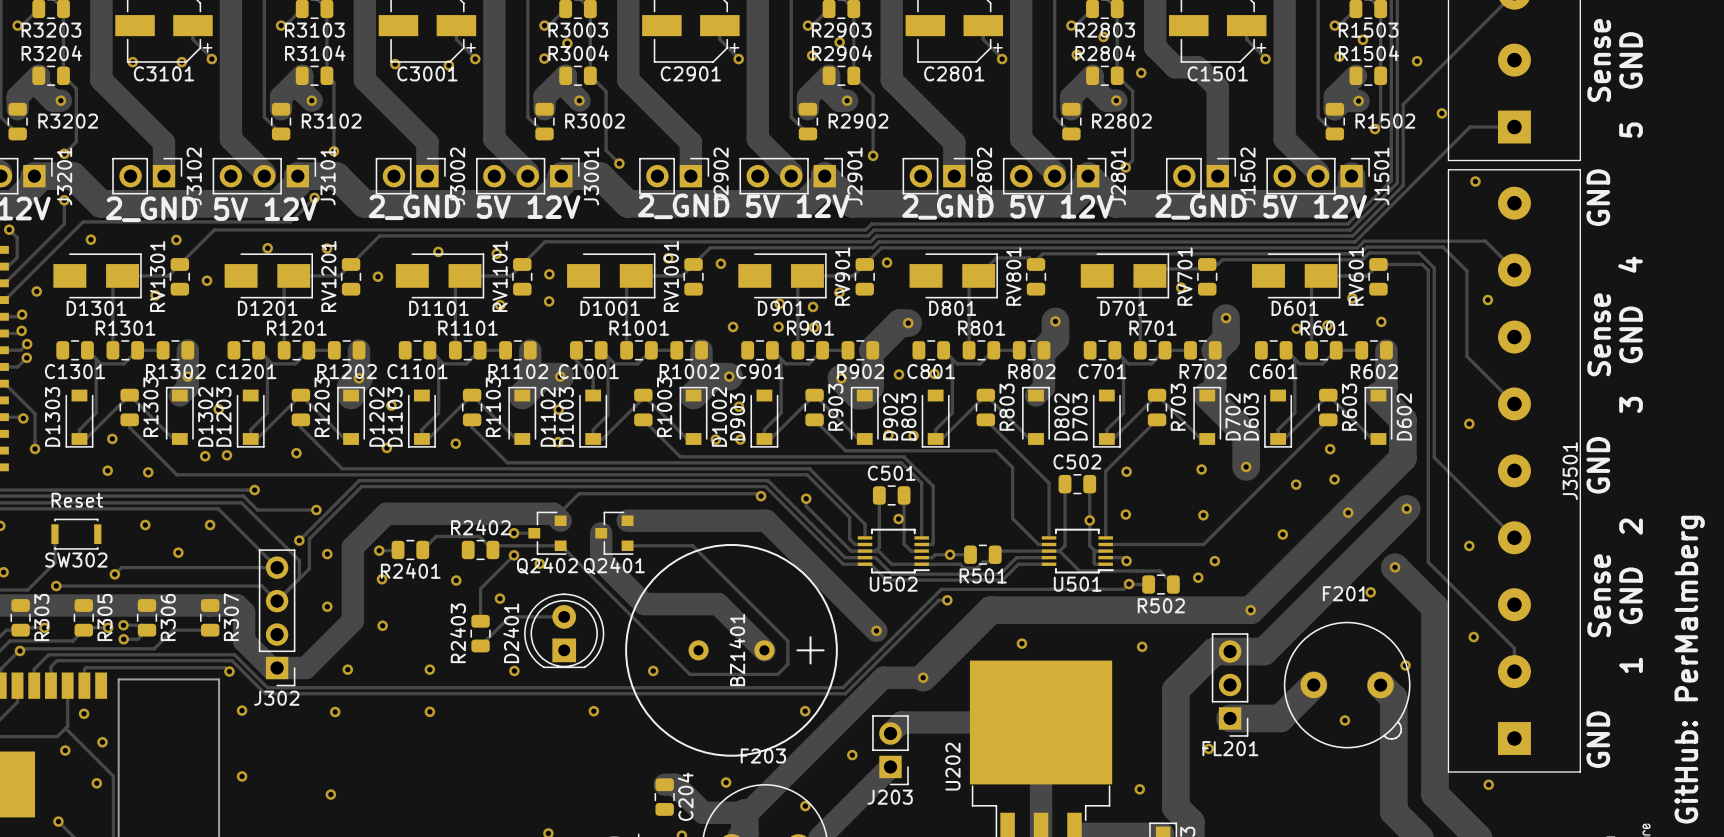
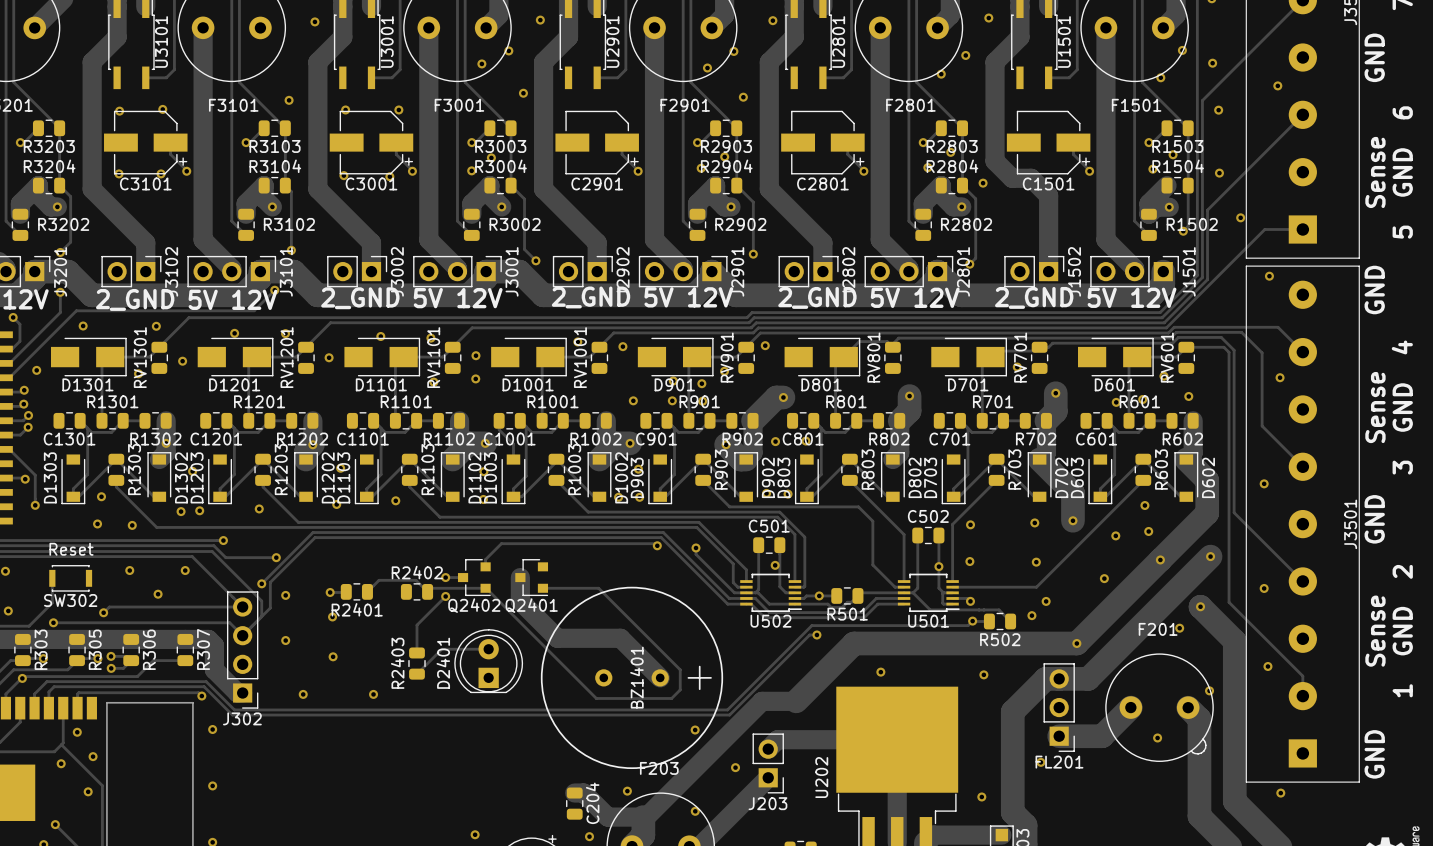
track: (560, 520) (553, 513) (386, 513) (352, 547) (352, 620) (305, 668) (277, 668) -> none
track: (627, 520) (766, 520) (876, 630) -> none
via: (539, 563) -> none
via: (456, 580) -> none
via: (499, 598) -> none
via: (876, 630) -> none
via: (514, 670) -> none
via: (653, 670) -> none
via: (923, 677) -> none
via: (335, 711) -> none
via: (429, 711) -> none
via: (593, 711) -> none
via: (330, 794) -> none

